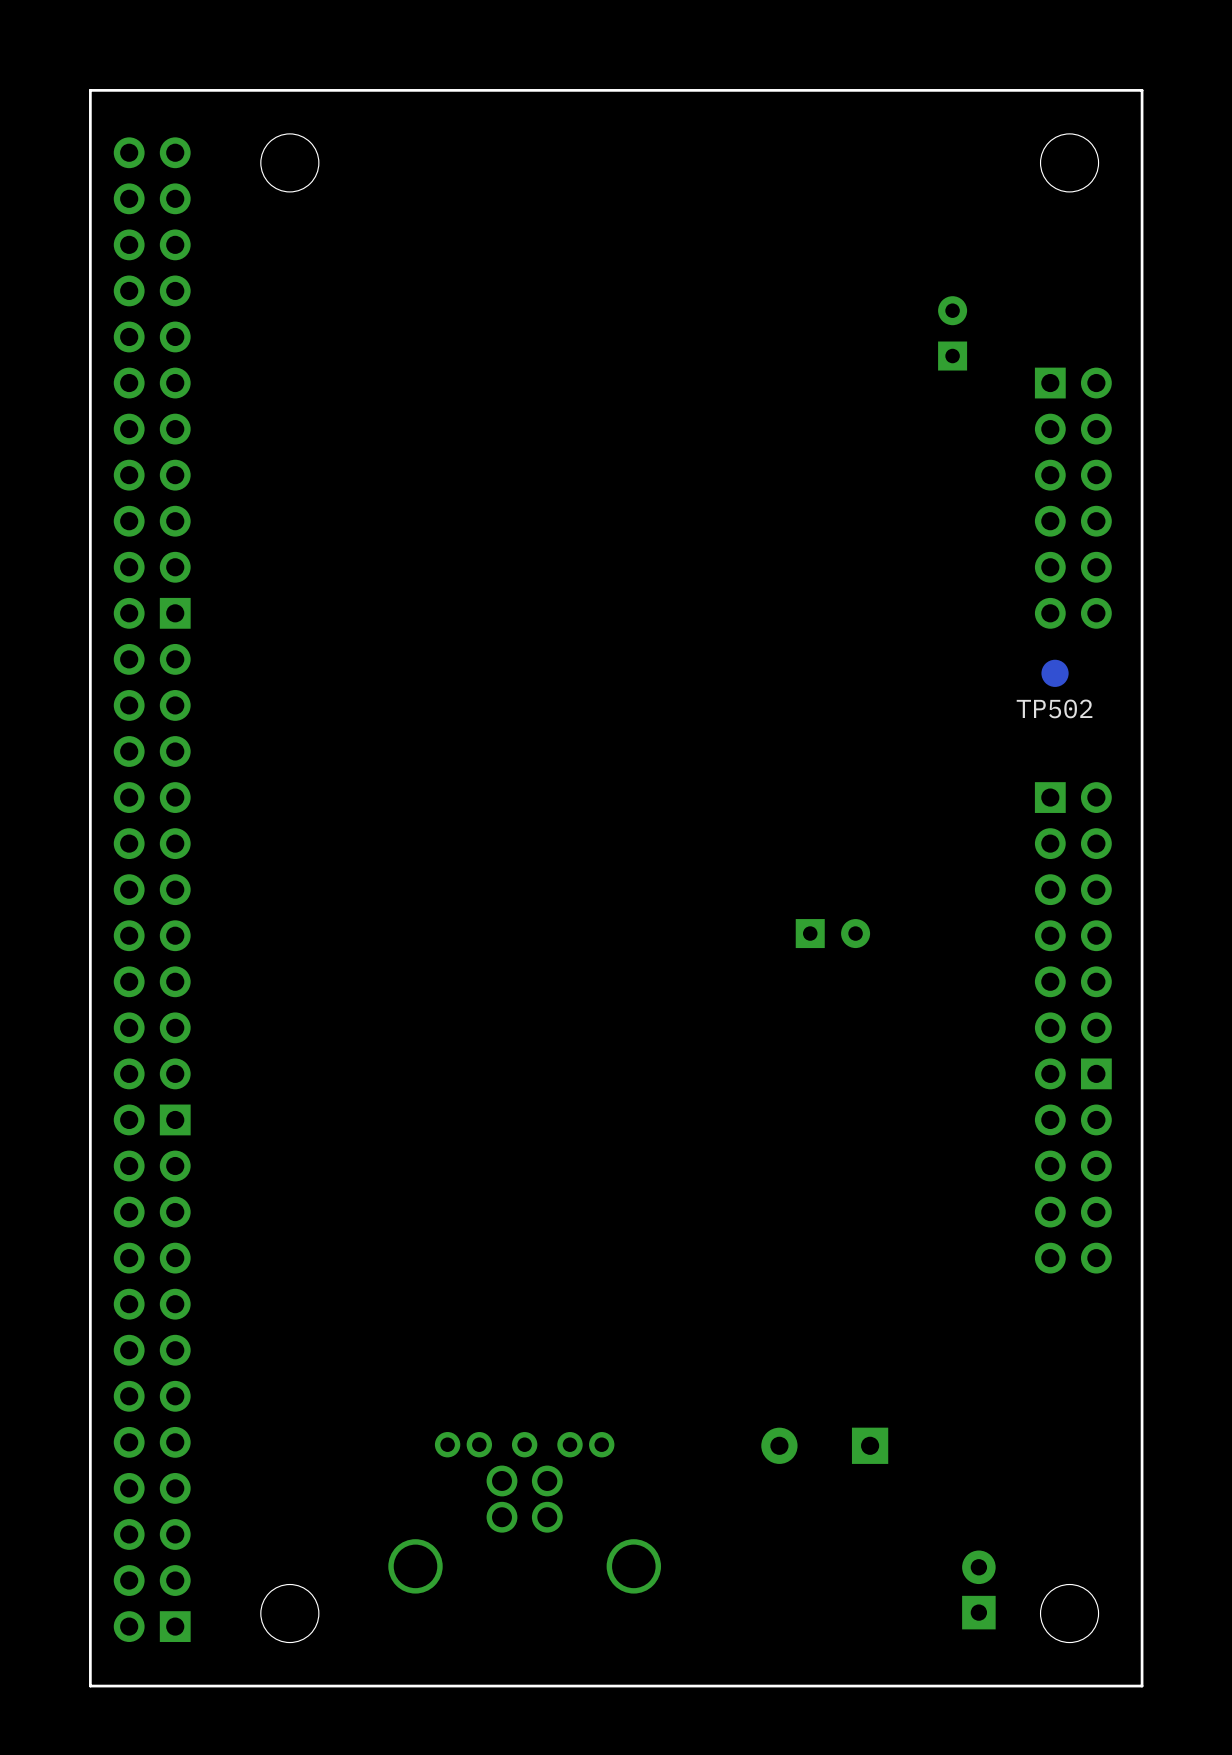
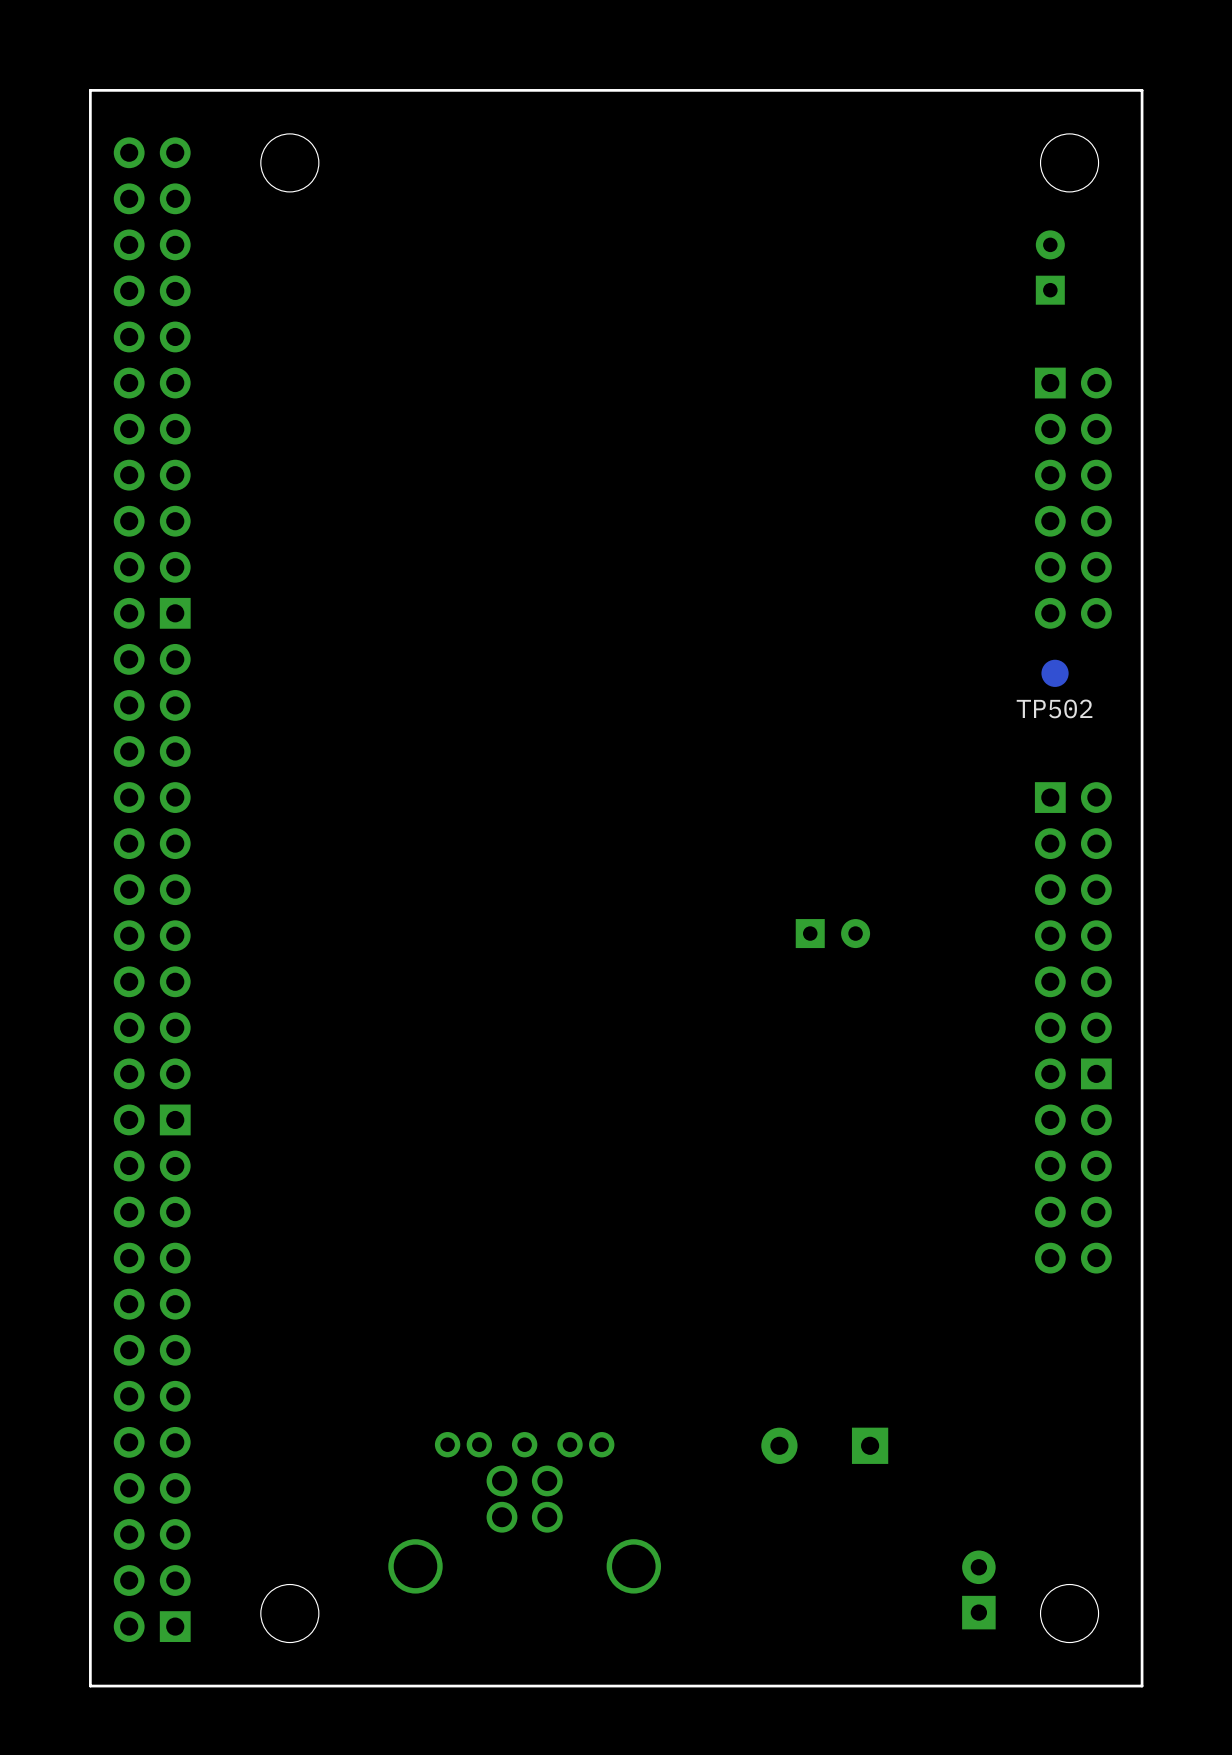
part position: (952, 333) -> (1050, 267)

